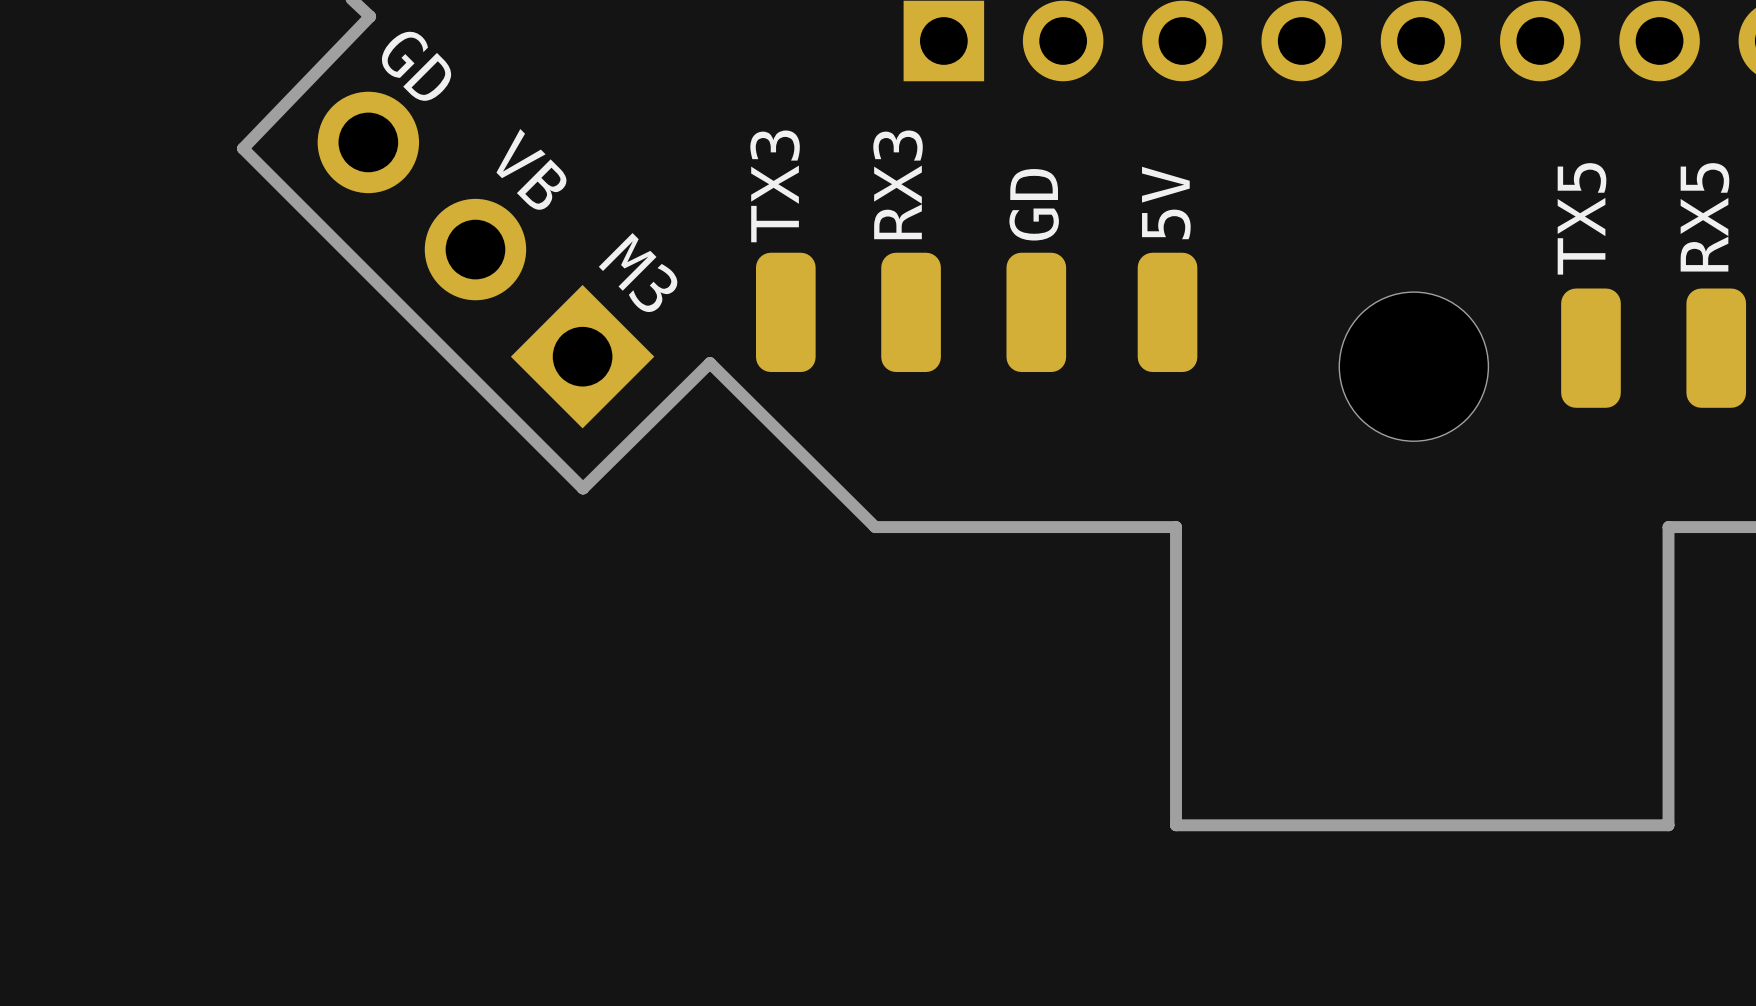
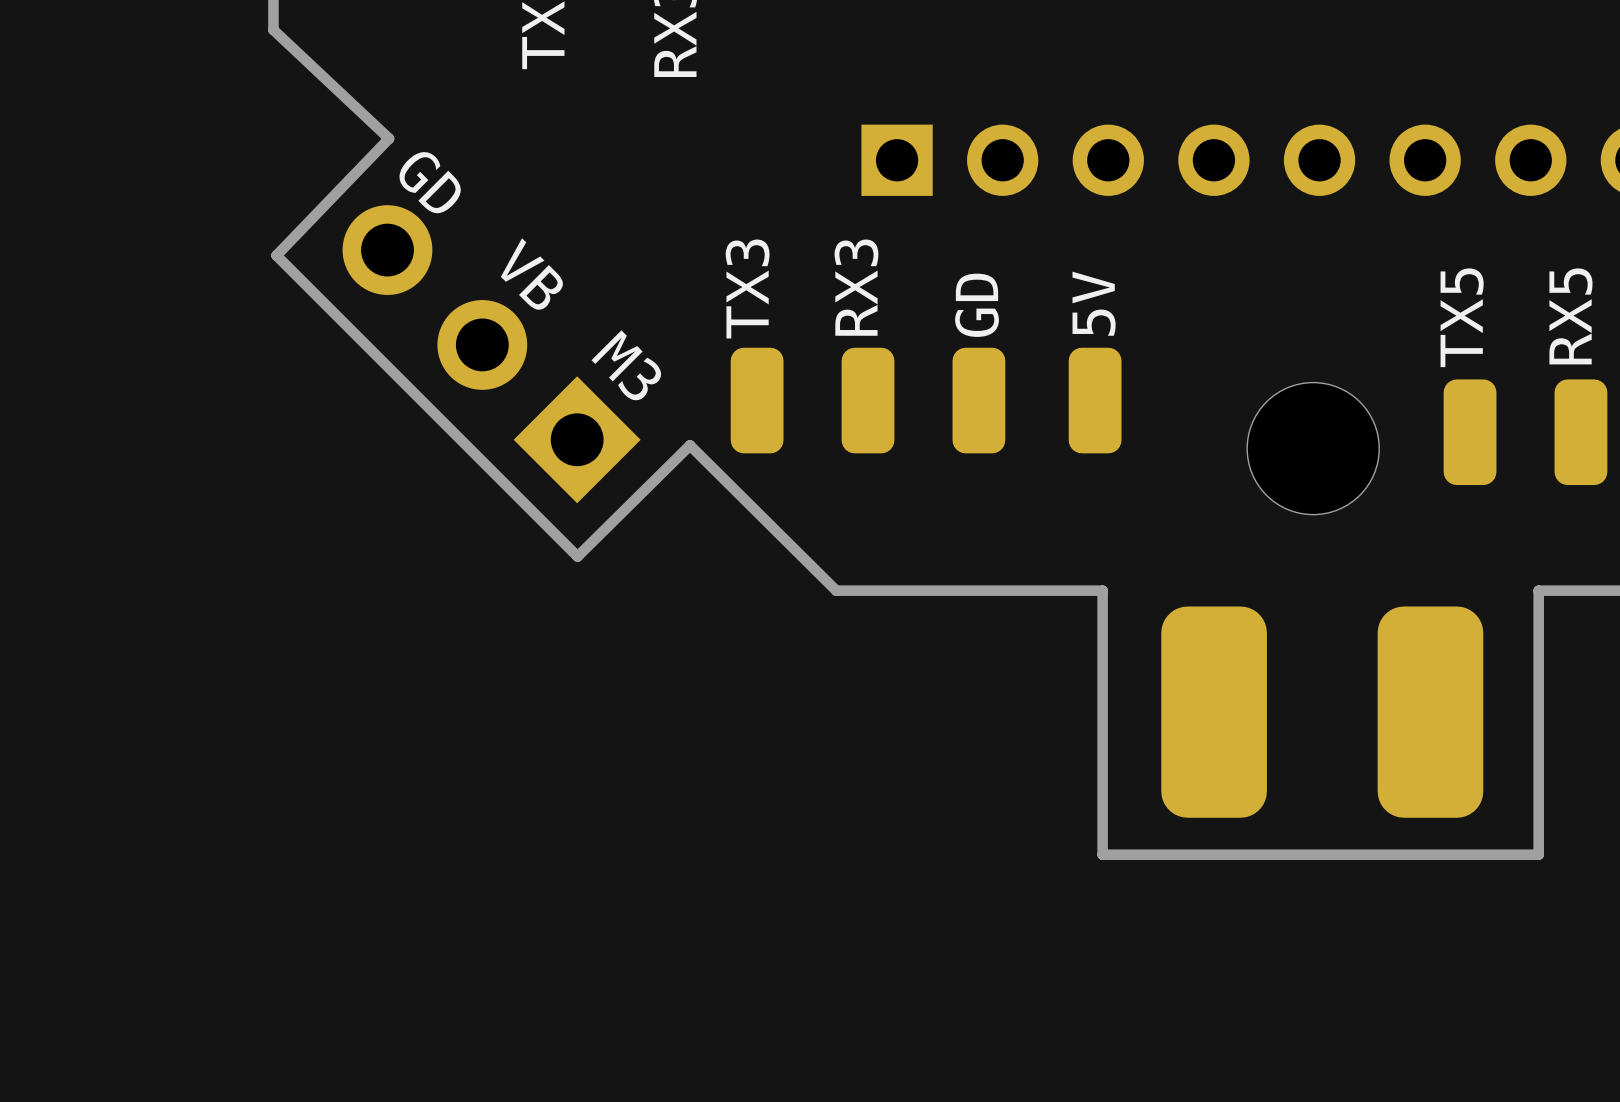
part: none -> (1214, 712)
part: none -> (1430, 712)

